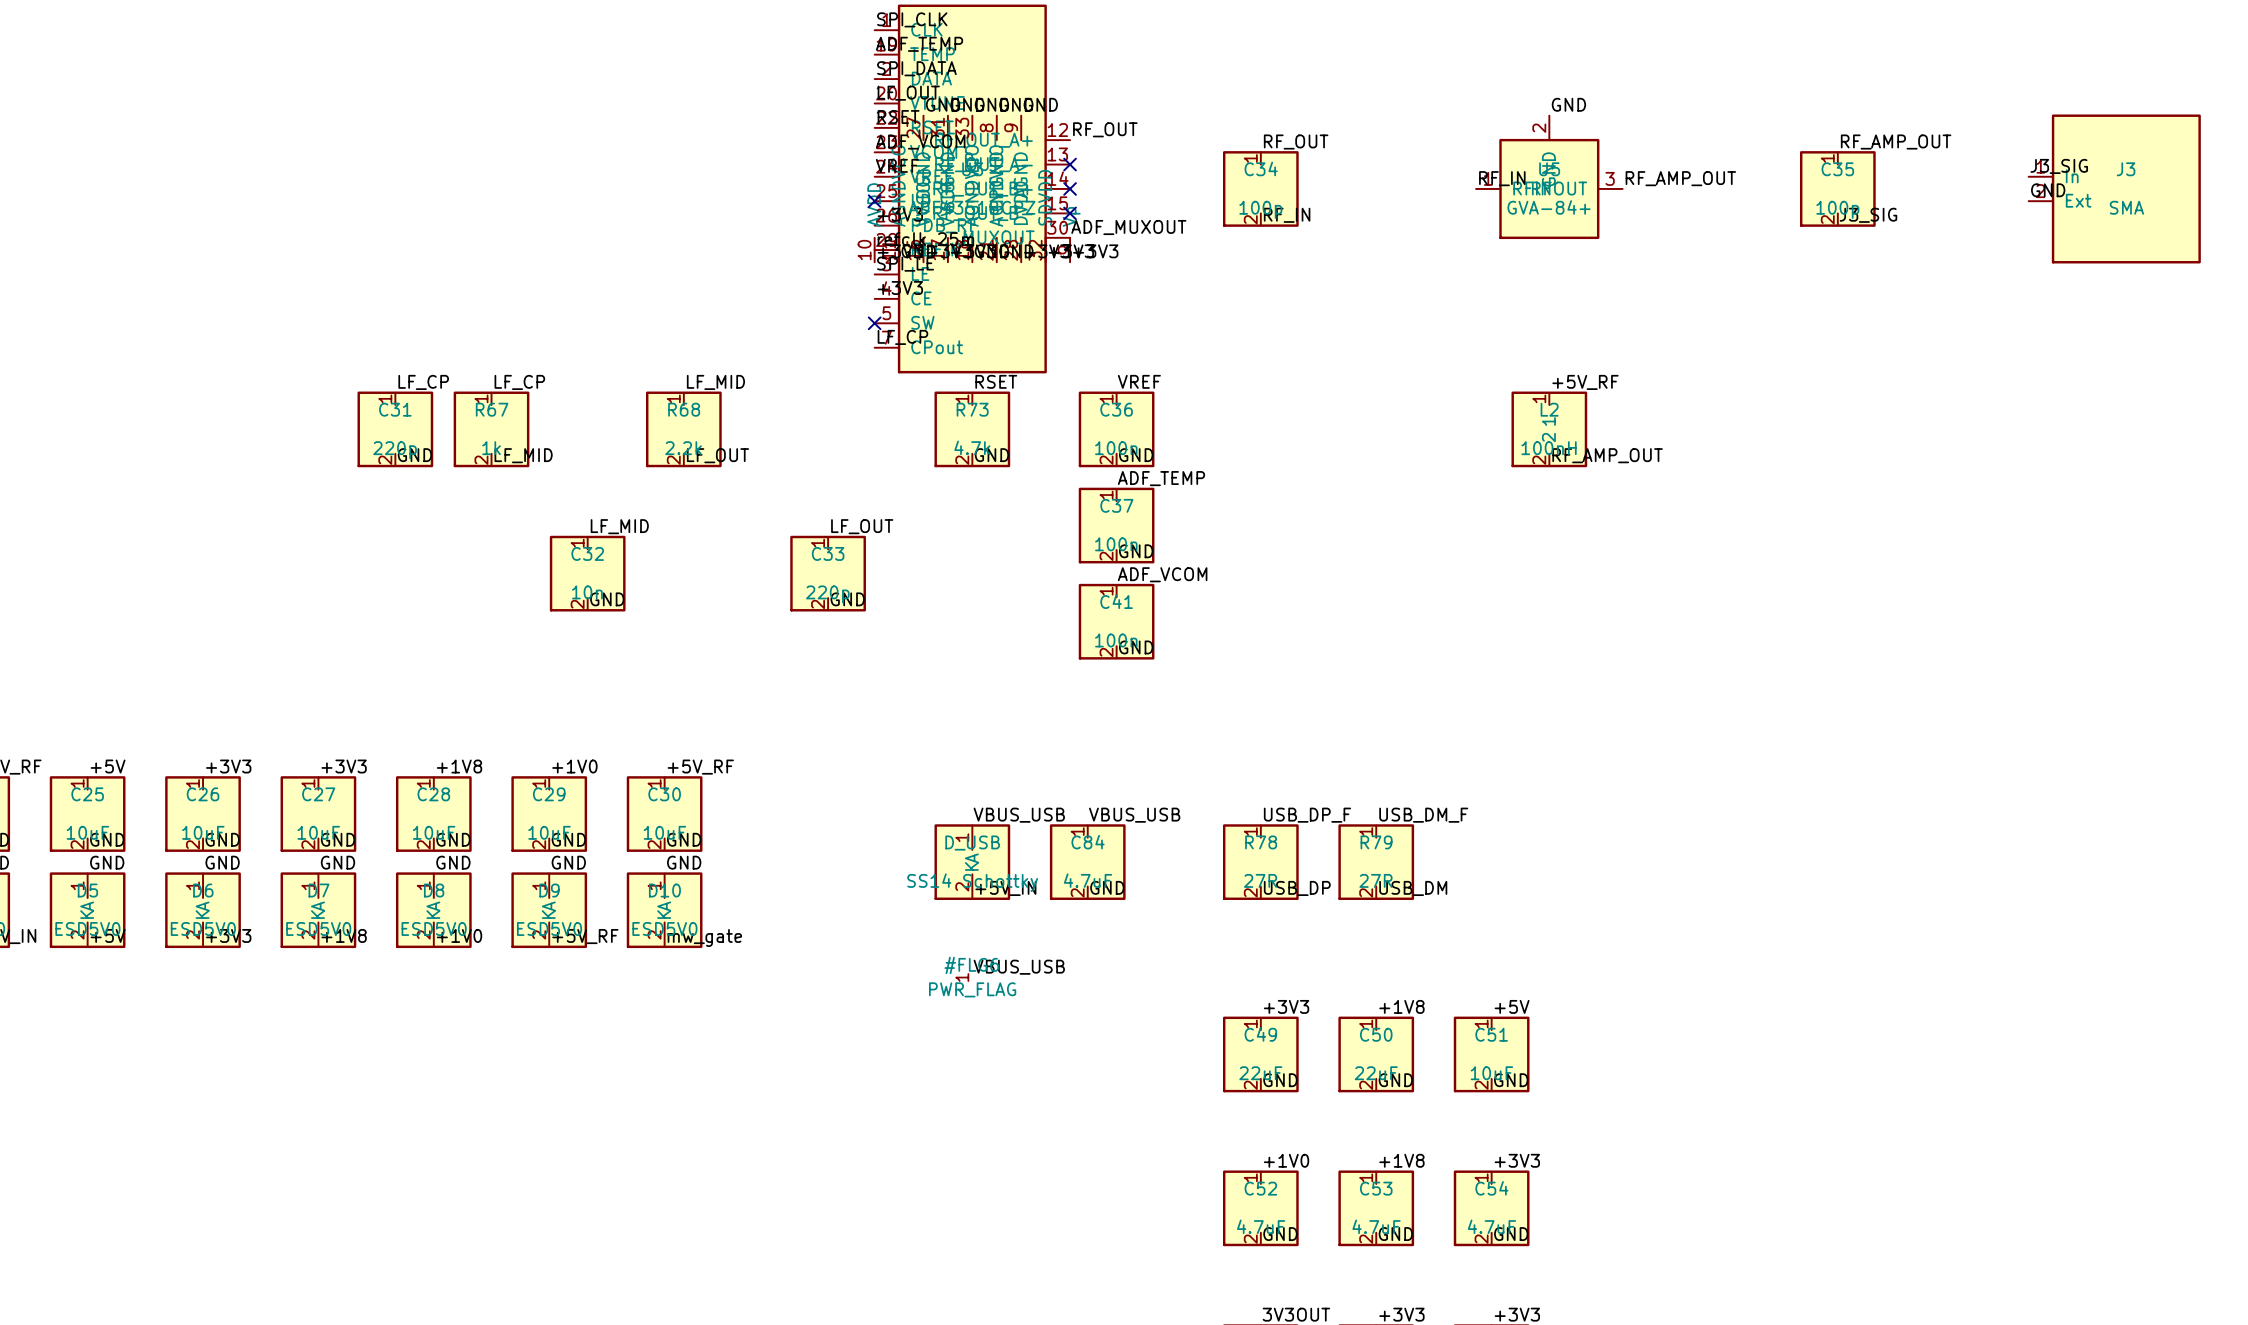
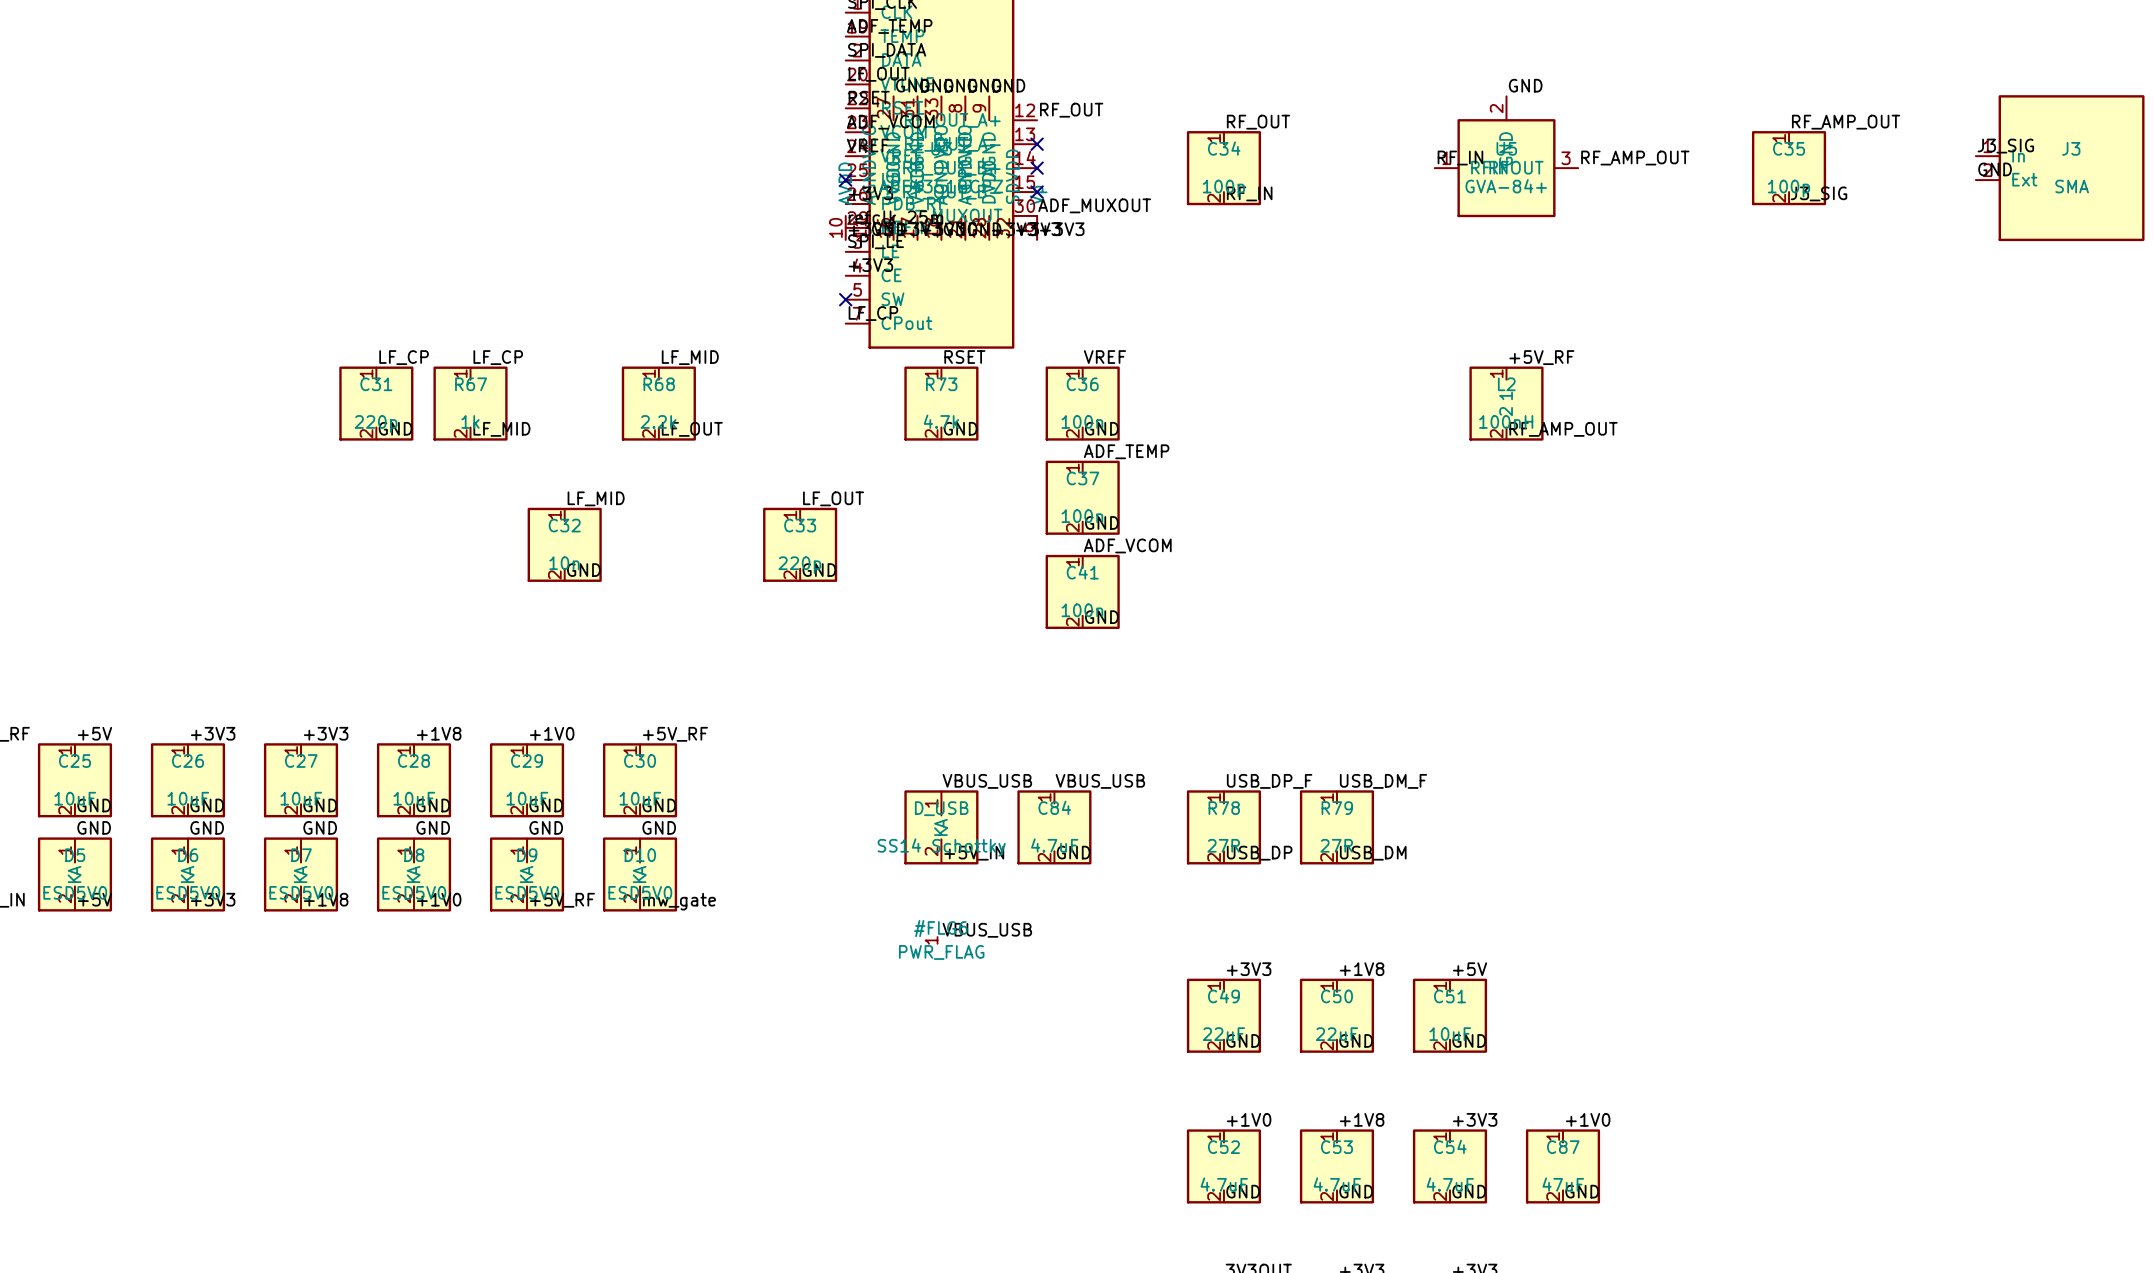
label: none -> +1V0 (1588, 1119)
C87: none -> 47uF (1562, 1166)
label: none -> GND (1582, 1191)

